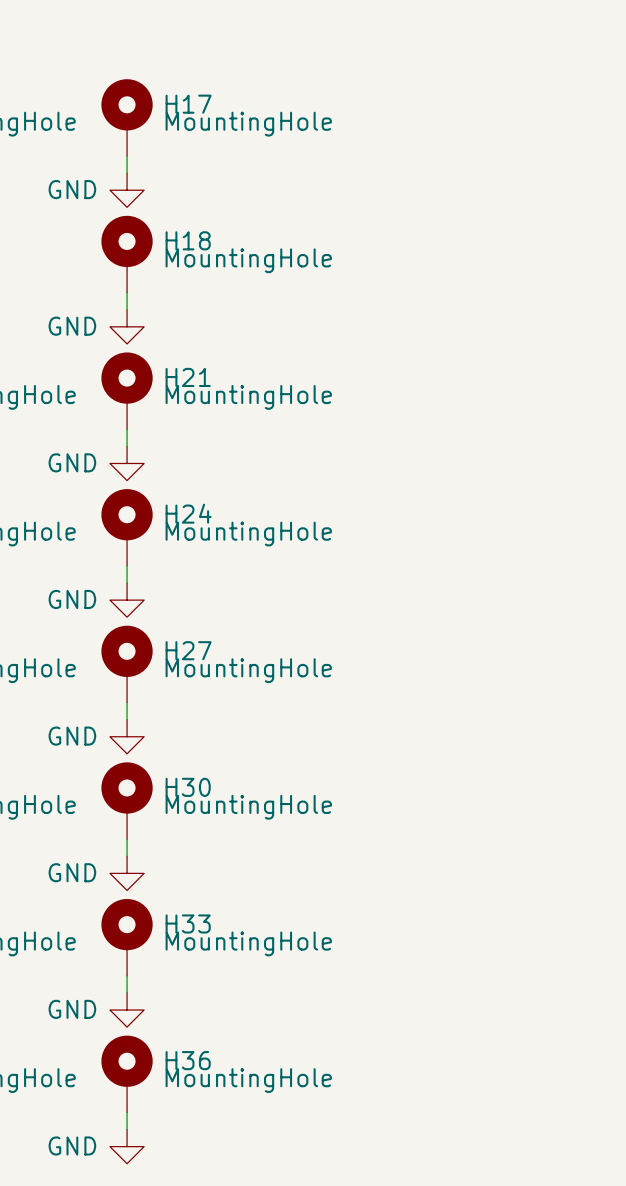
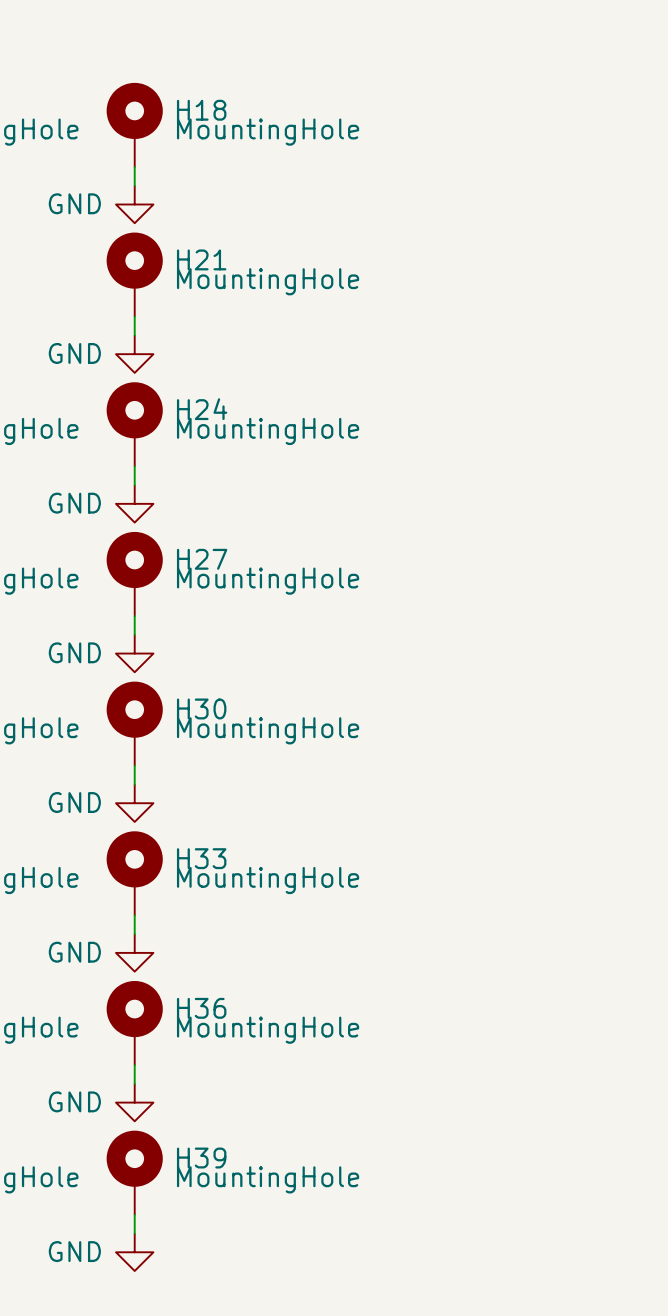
H17 name: H17 (188, 104) -> H18 (201, 110)
H18 name: H18 (188, 240) -> H21 (201, 259)
H21 name: H21 (188, 377) -> H24 (202, 409)
H24 name: H24 (188, 513) -> H27 (202, 559)
H27 name: H27 (188, 650) -> H30 (201, 708)
H30 name: H30 (188, 787) -> H33 (201, 858)
H33 name: H33 (188, 923) -> H36 (201, 1008)
H36 name: H36 (188, 1060) -> H39 (201, 1158)

